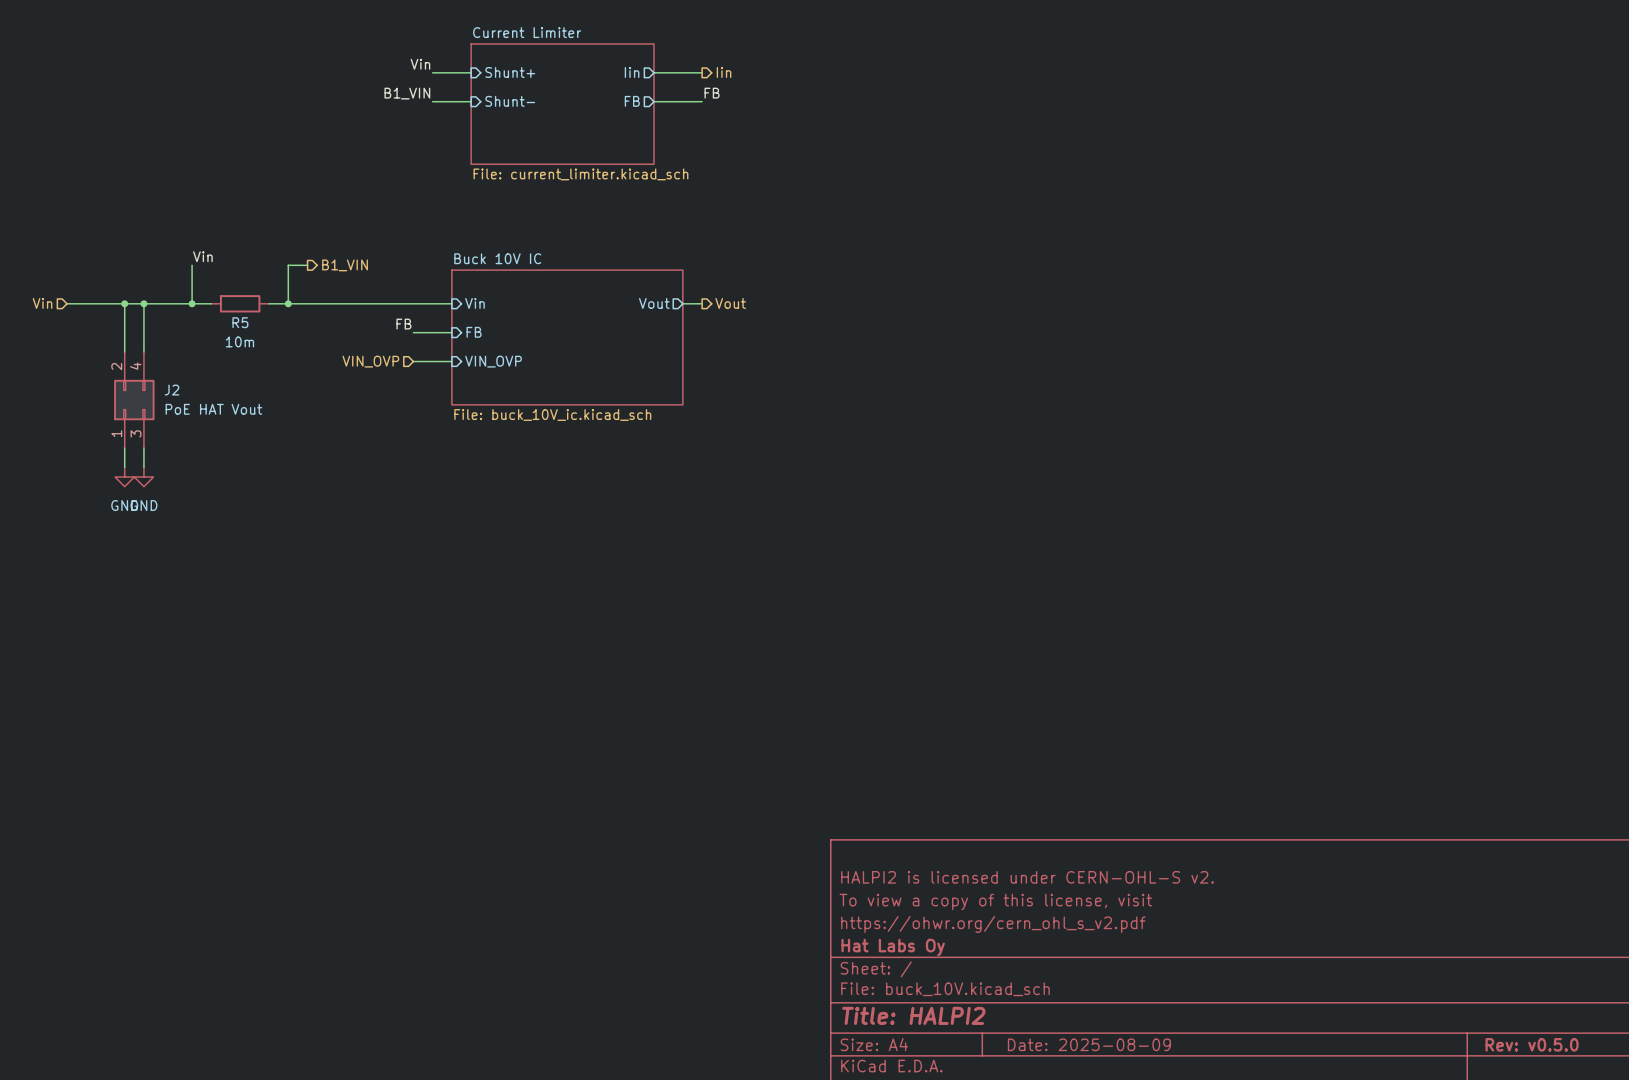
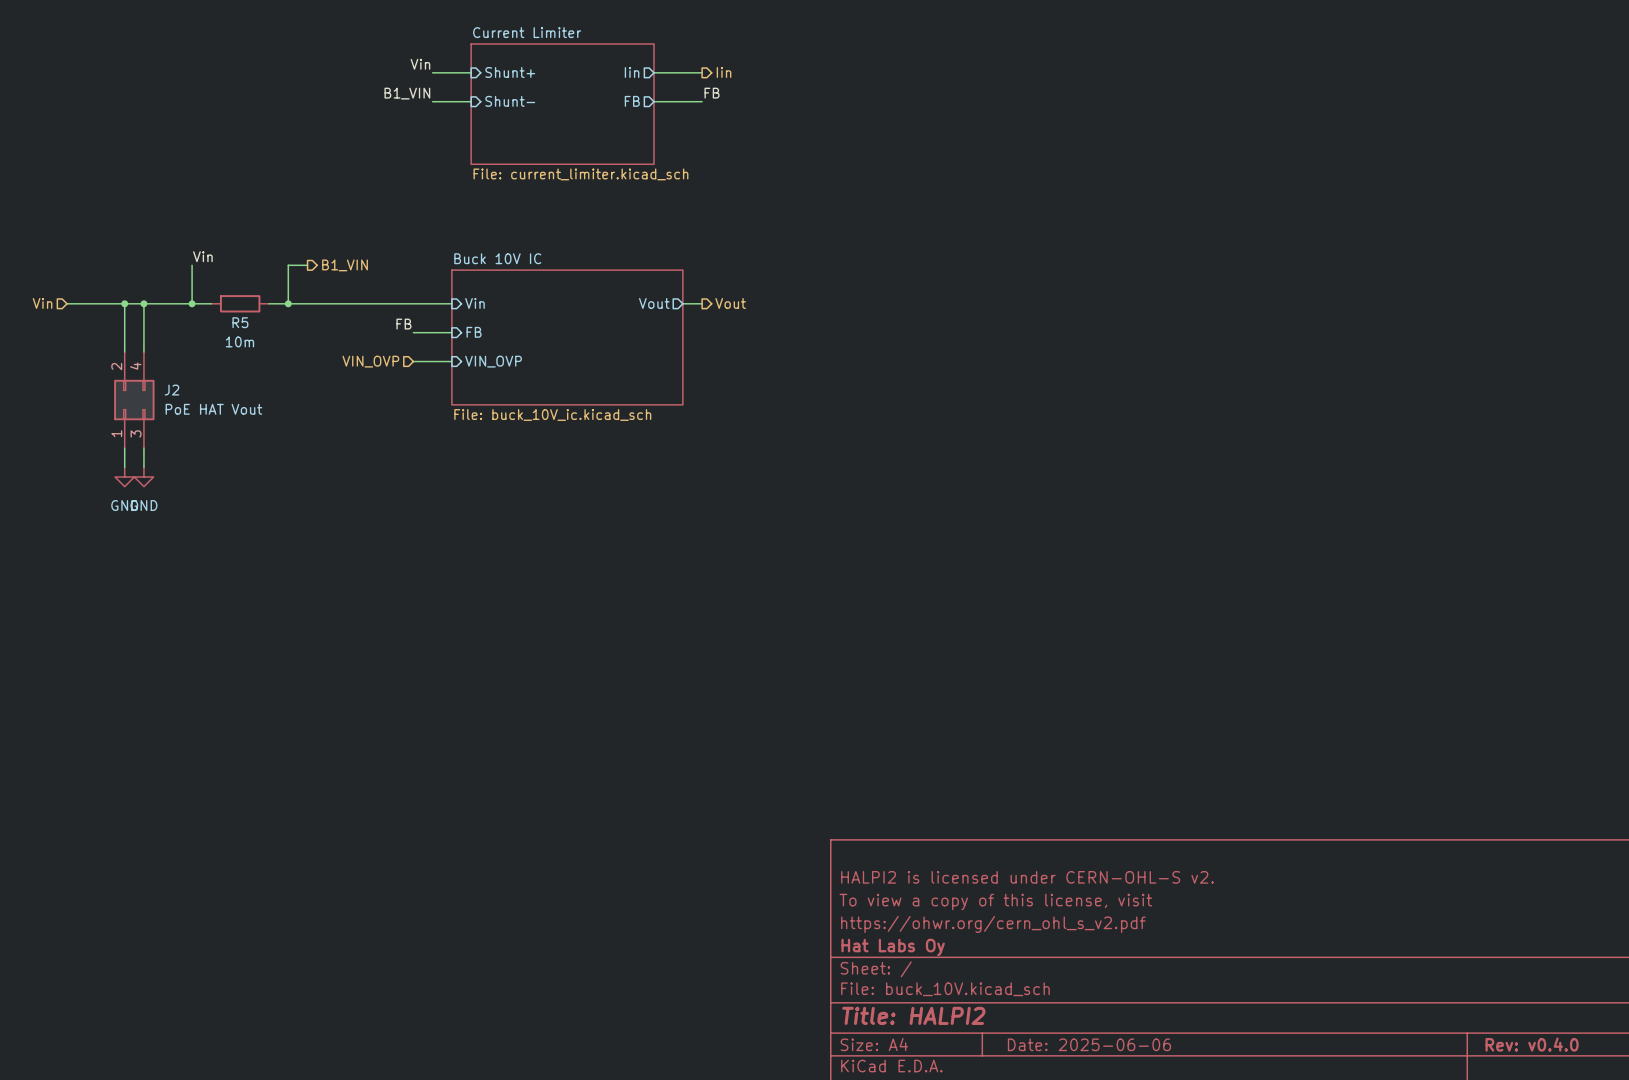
title block: Date: 2025-08-09 (1089, 1044) -> Date: 2025-06-06 (1089, 1044)
title block: Rev: v0.5.0 (1532, 1044) -> Rev: v0.4.0 (1532, 1044)

